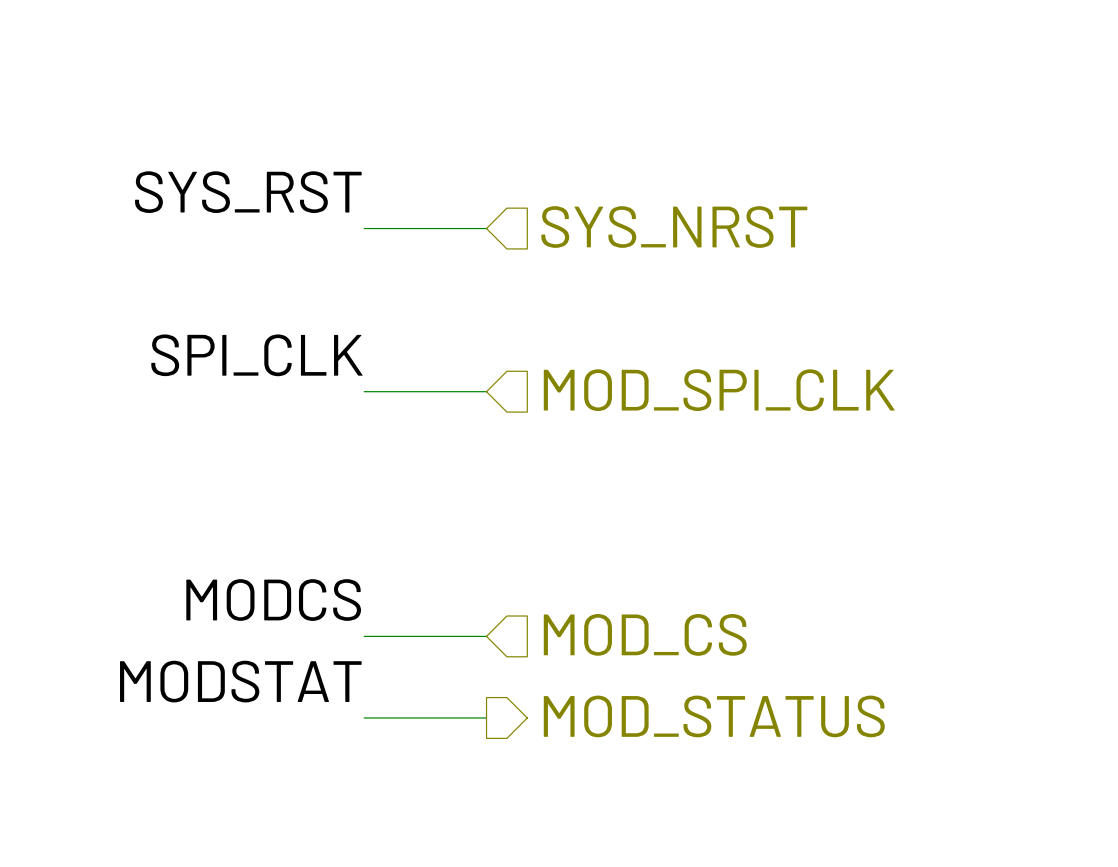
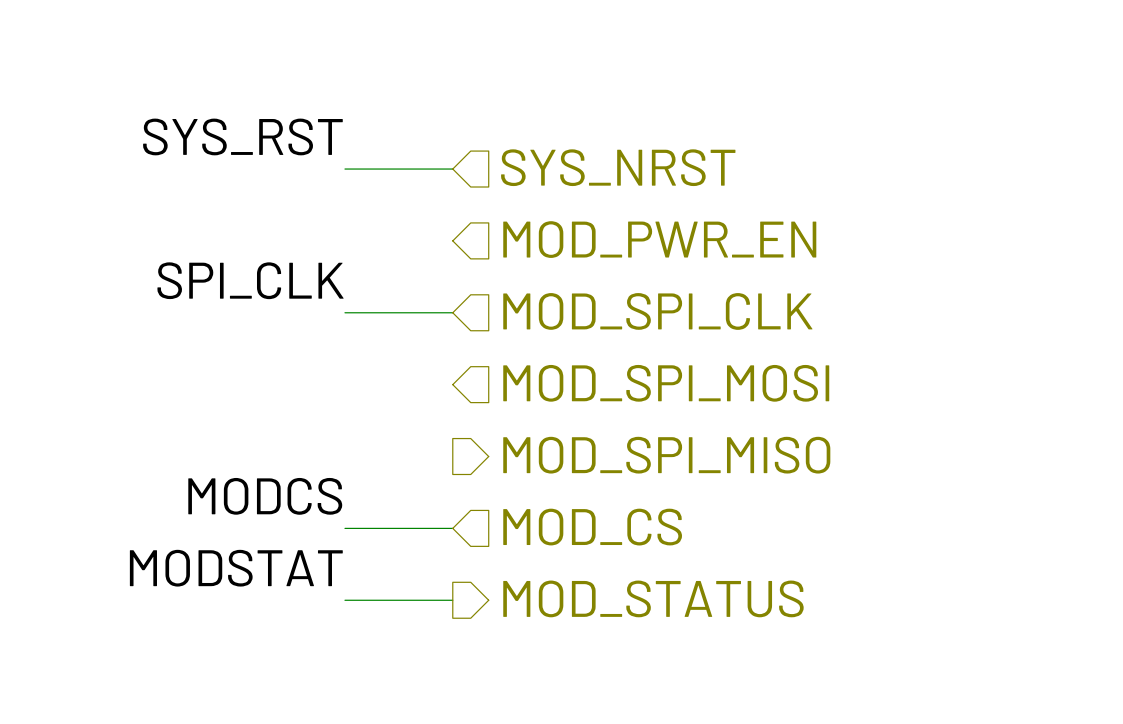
hierarchical label: none -> MOD_PWR_EN (659, 239)
hierarchical label: none -> MOD_SPI_MOSI (666, 383)
hierarchical label: none -> MOD_SPI_MISO (666, 455)

